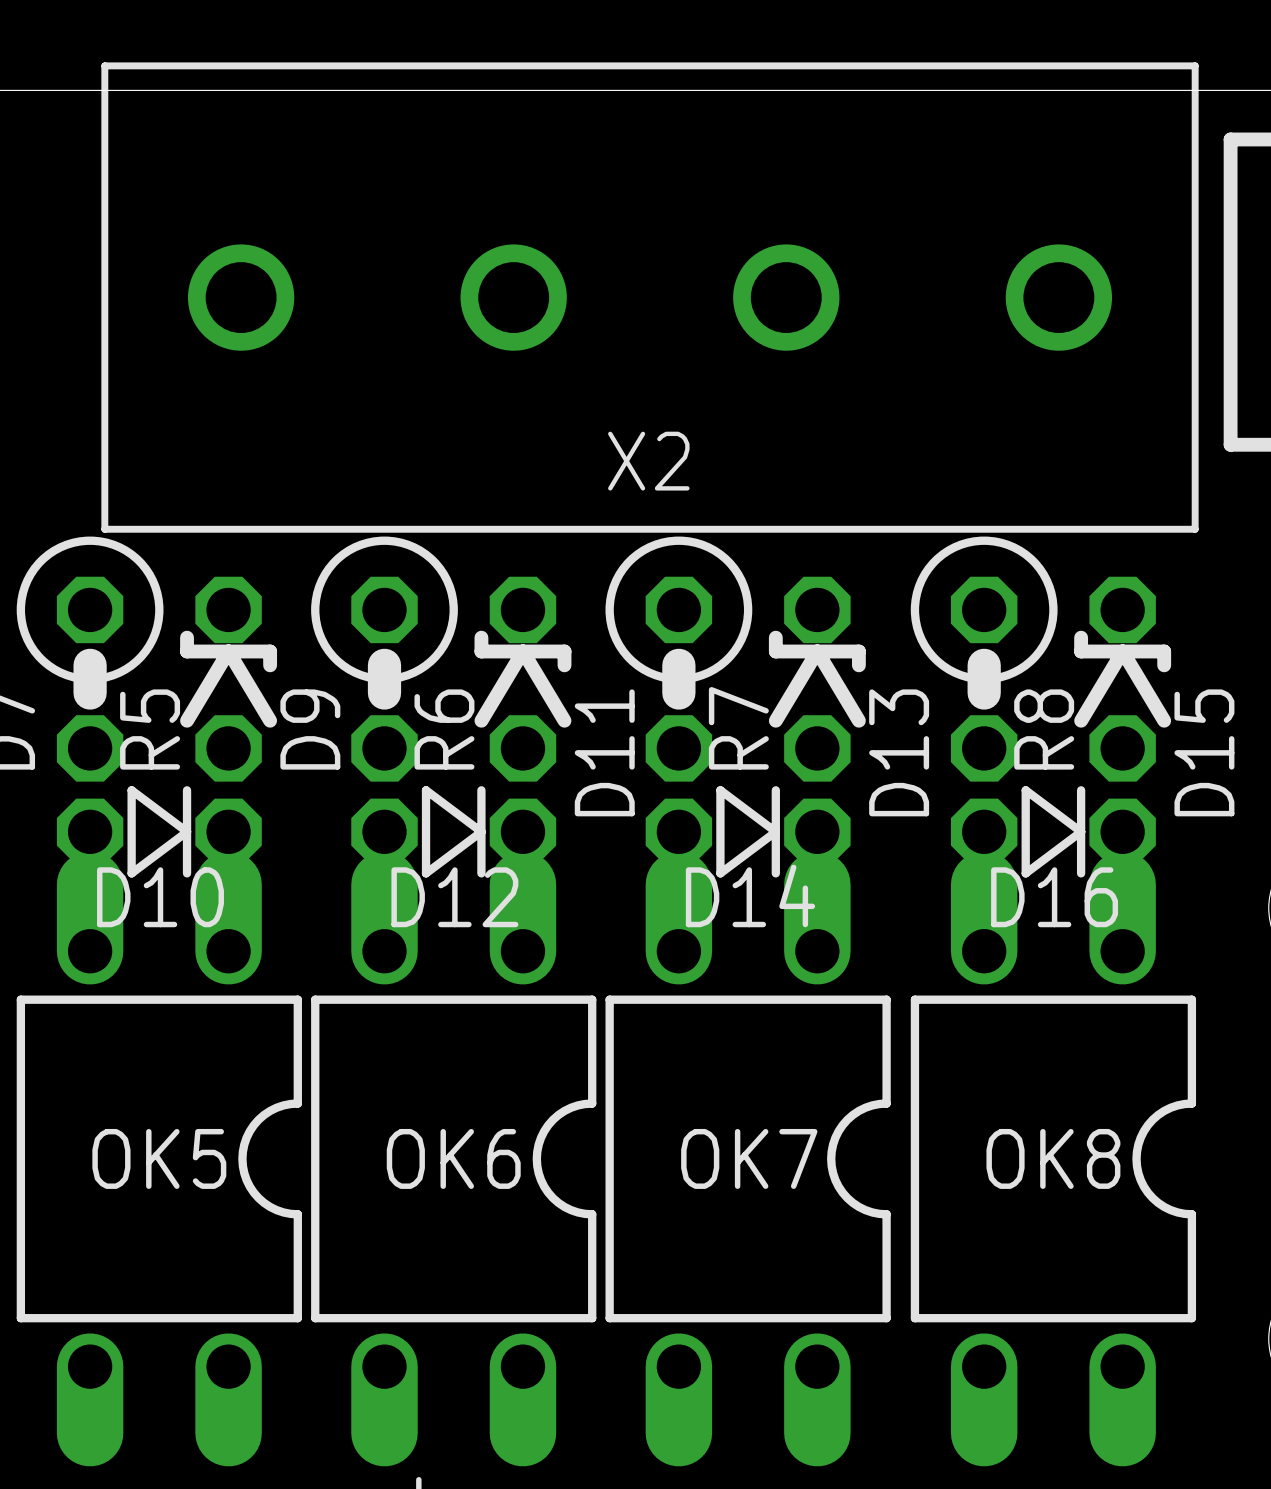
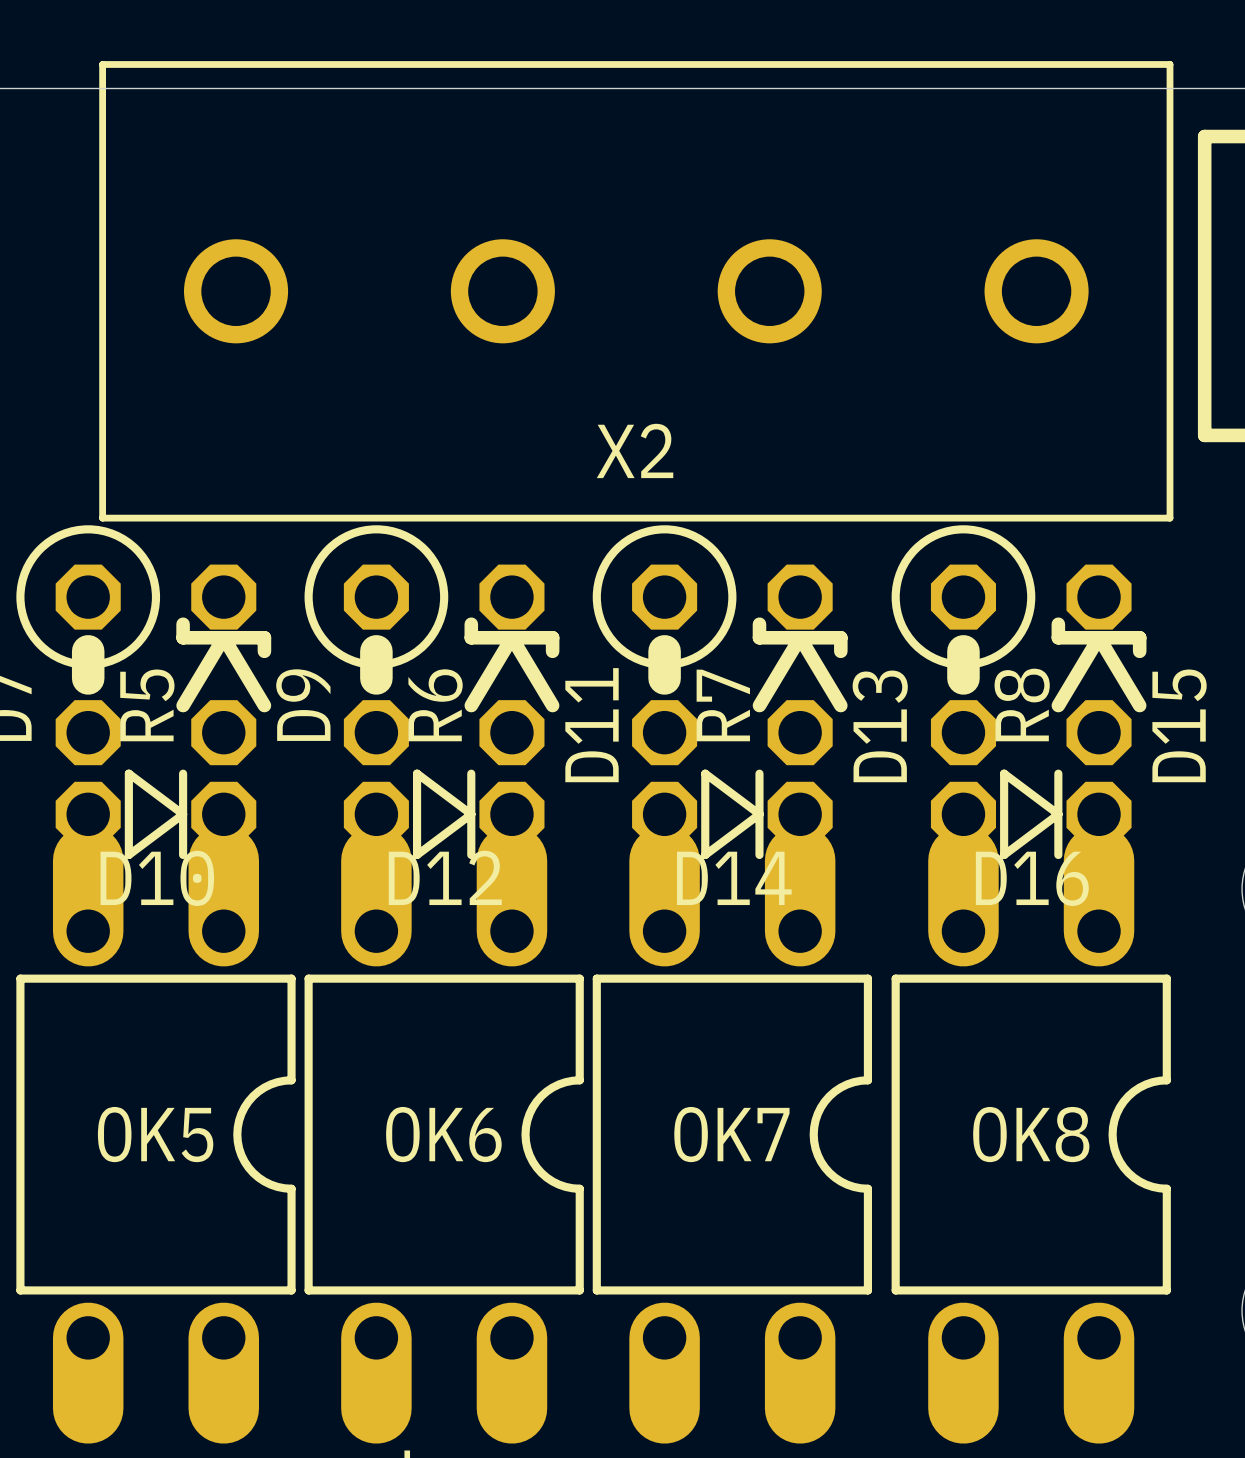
OK5 footprint: [16, 851, 302, 1467] -> [16, 825, 296, 1444]
OK6 footprint: [311, 851, 597, 1467] -> [304, 825, 584, 1444]
OK7 footprint: [605, 851, 891, 1467] -> [592, 825, 873, 1444]
OK8 footprint: [910, 851, 1197, 1467] -> [891, 825, 1171, 1444]

